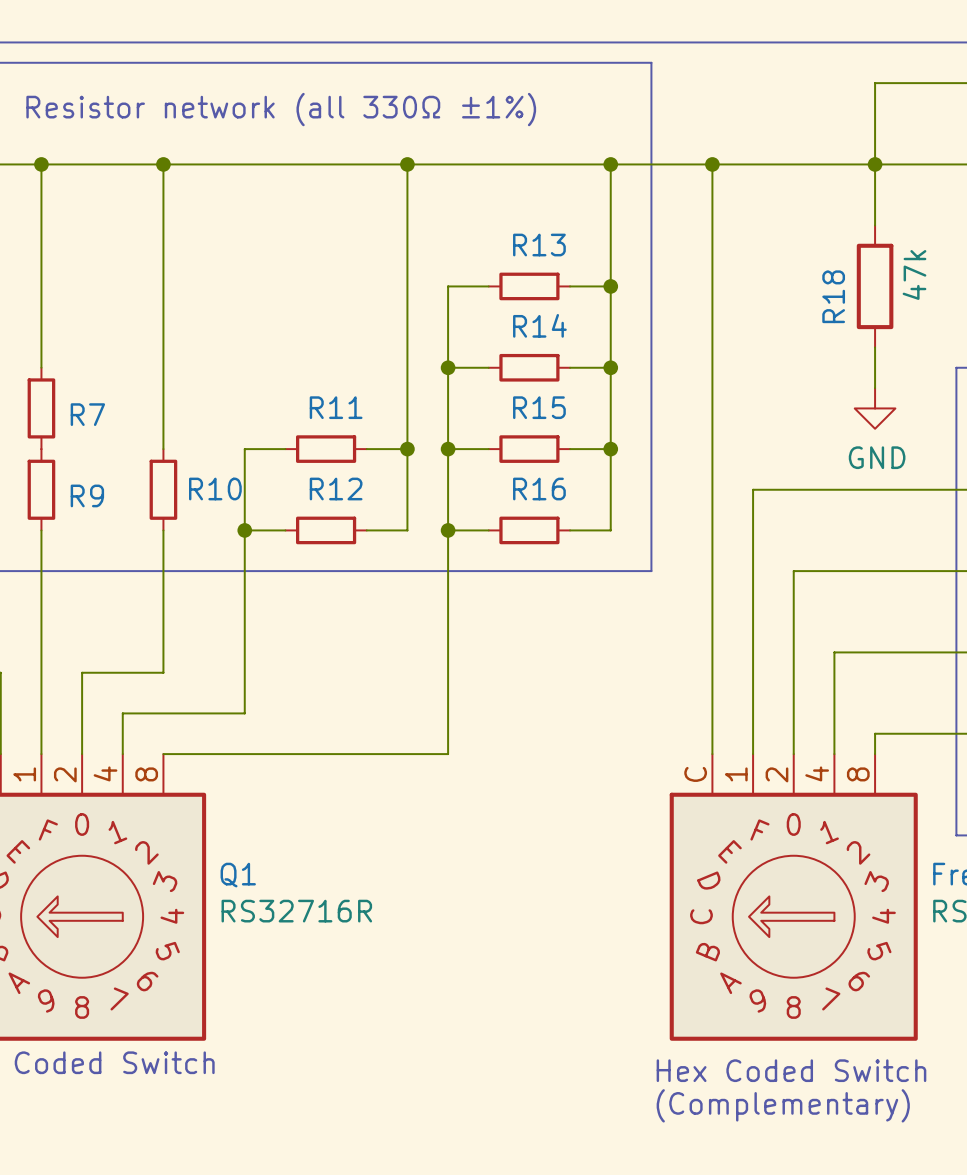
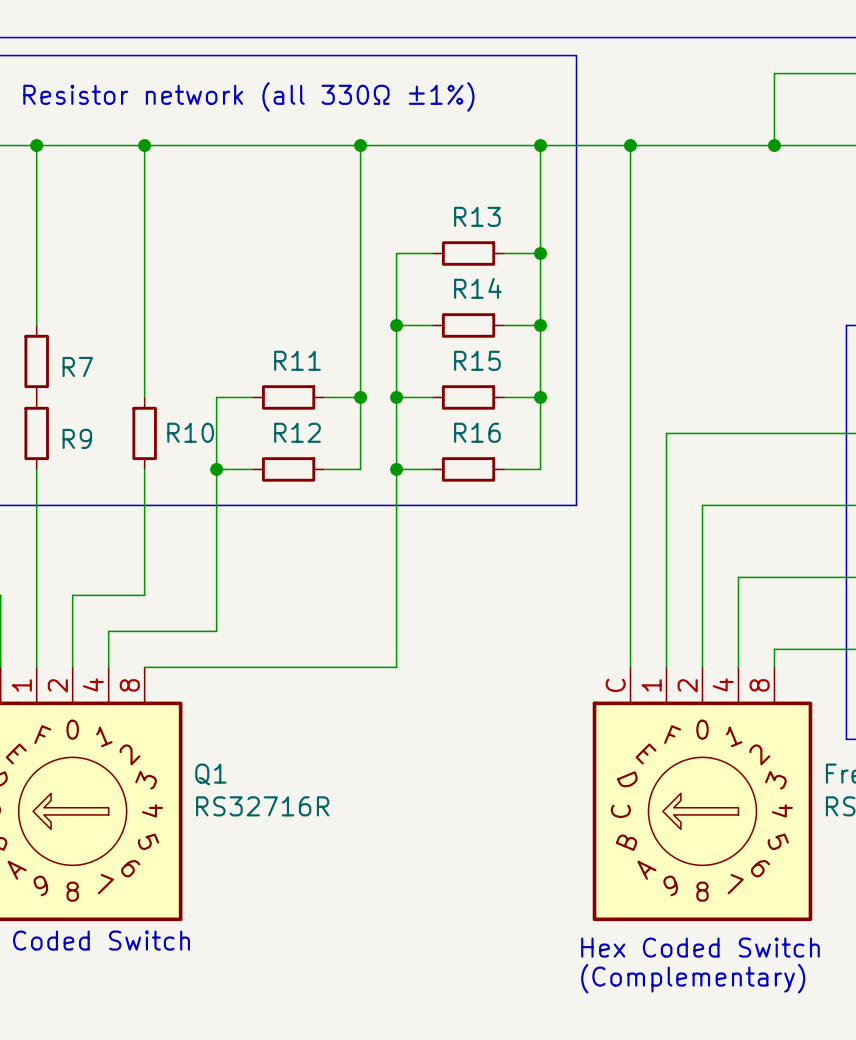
wire: (875, 164) (875, 225) -> none
R18: 47k (875, 286) -> none
wire: (875, 347) (875, 388) -> none
power symbol: GND (875, 408) -> none

